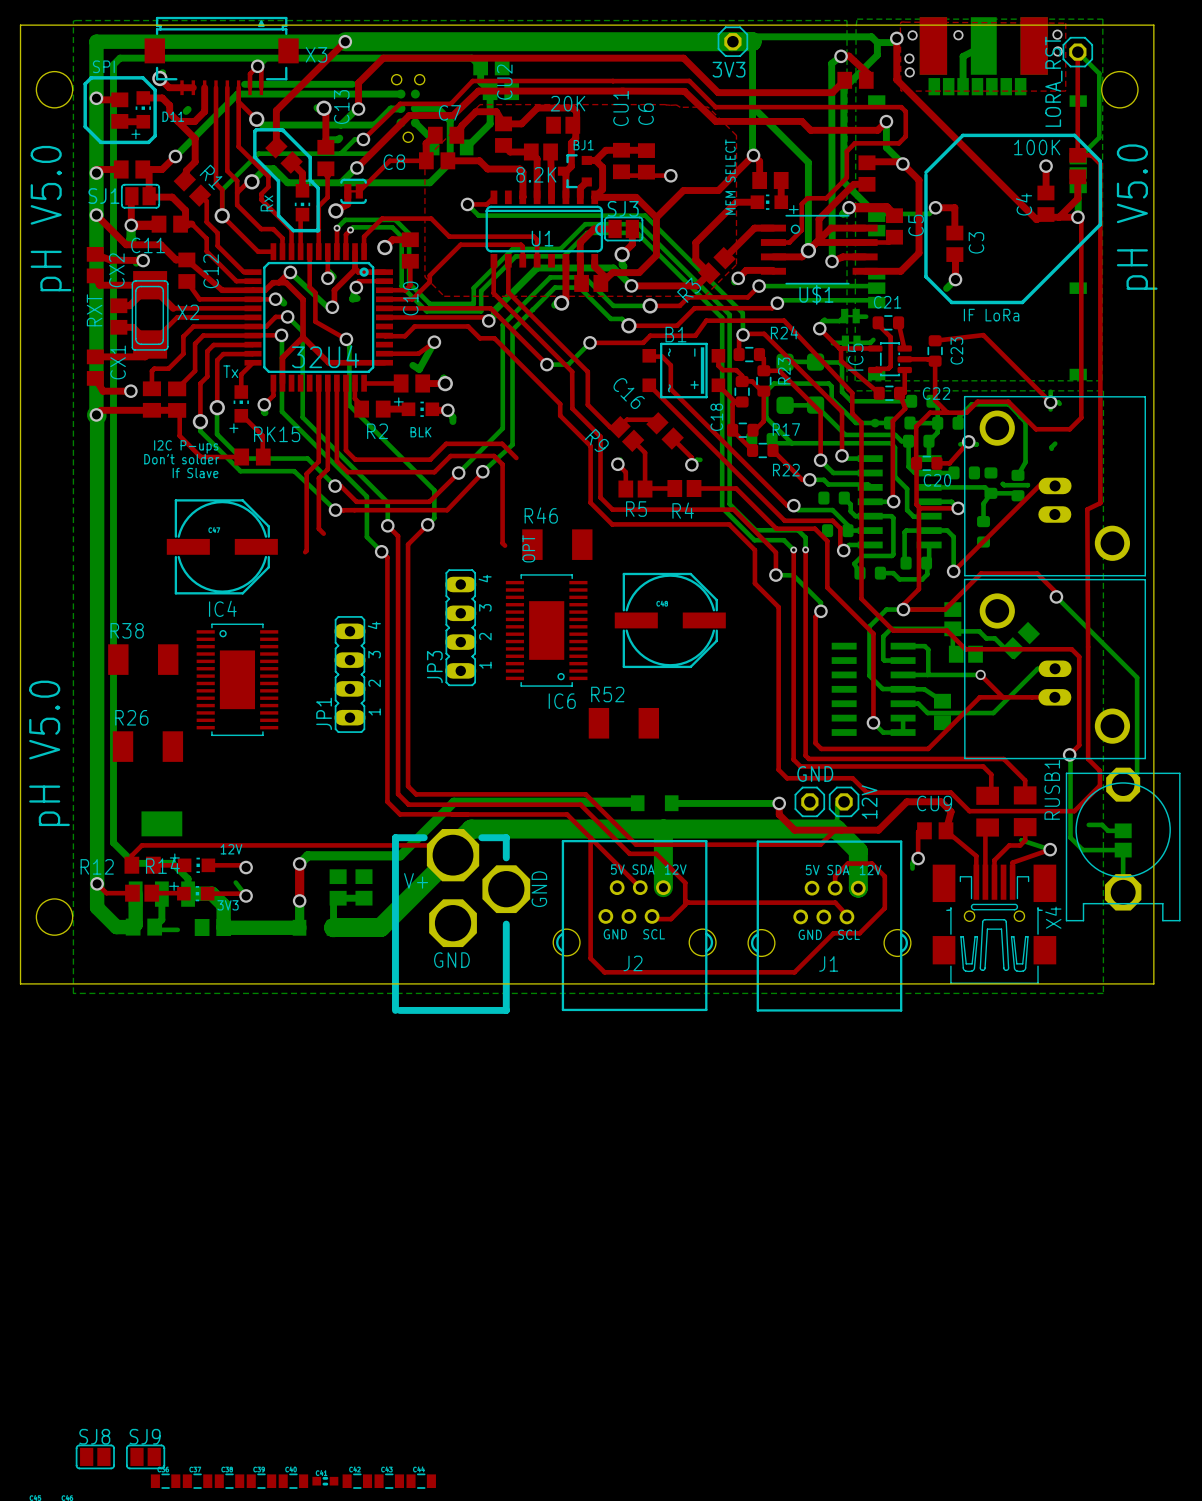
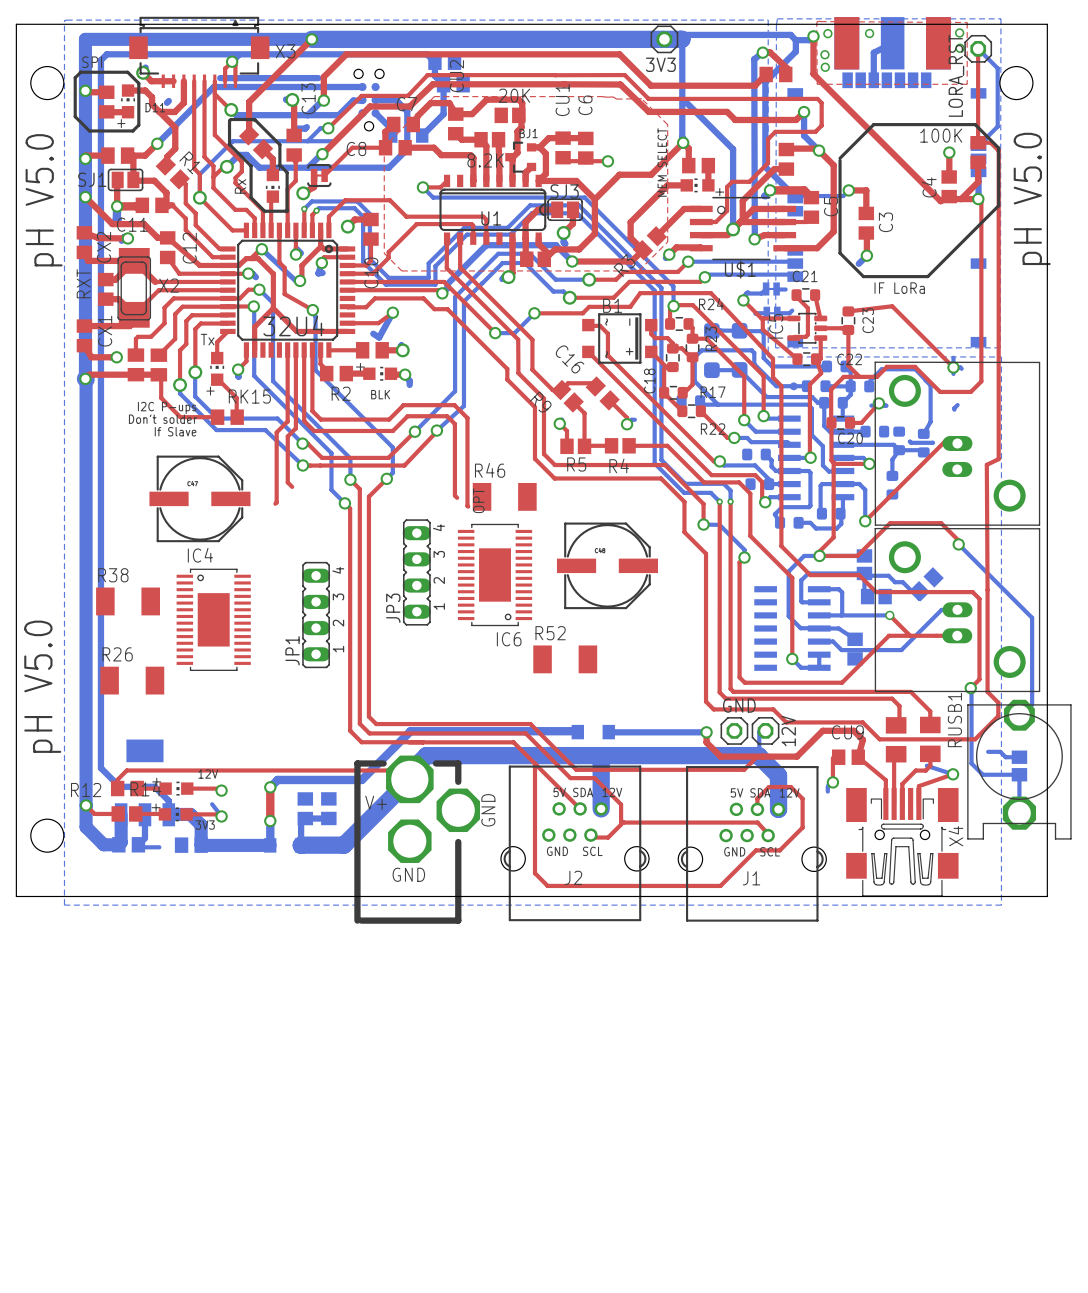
top track: none -> (467, 418) (468, 506)

